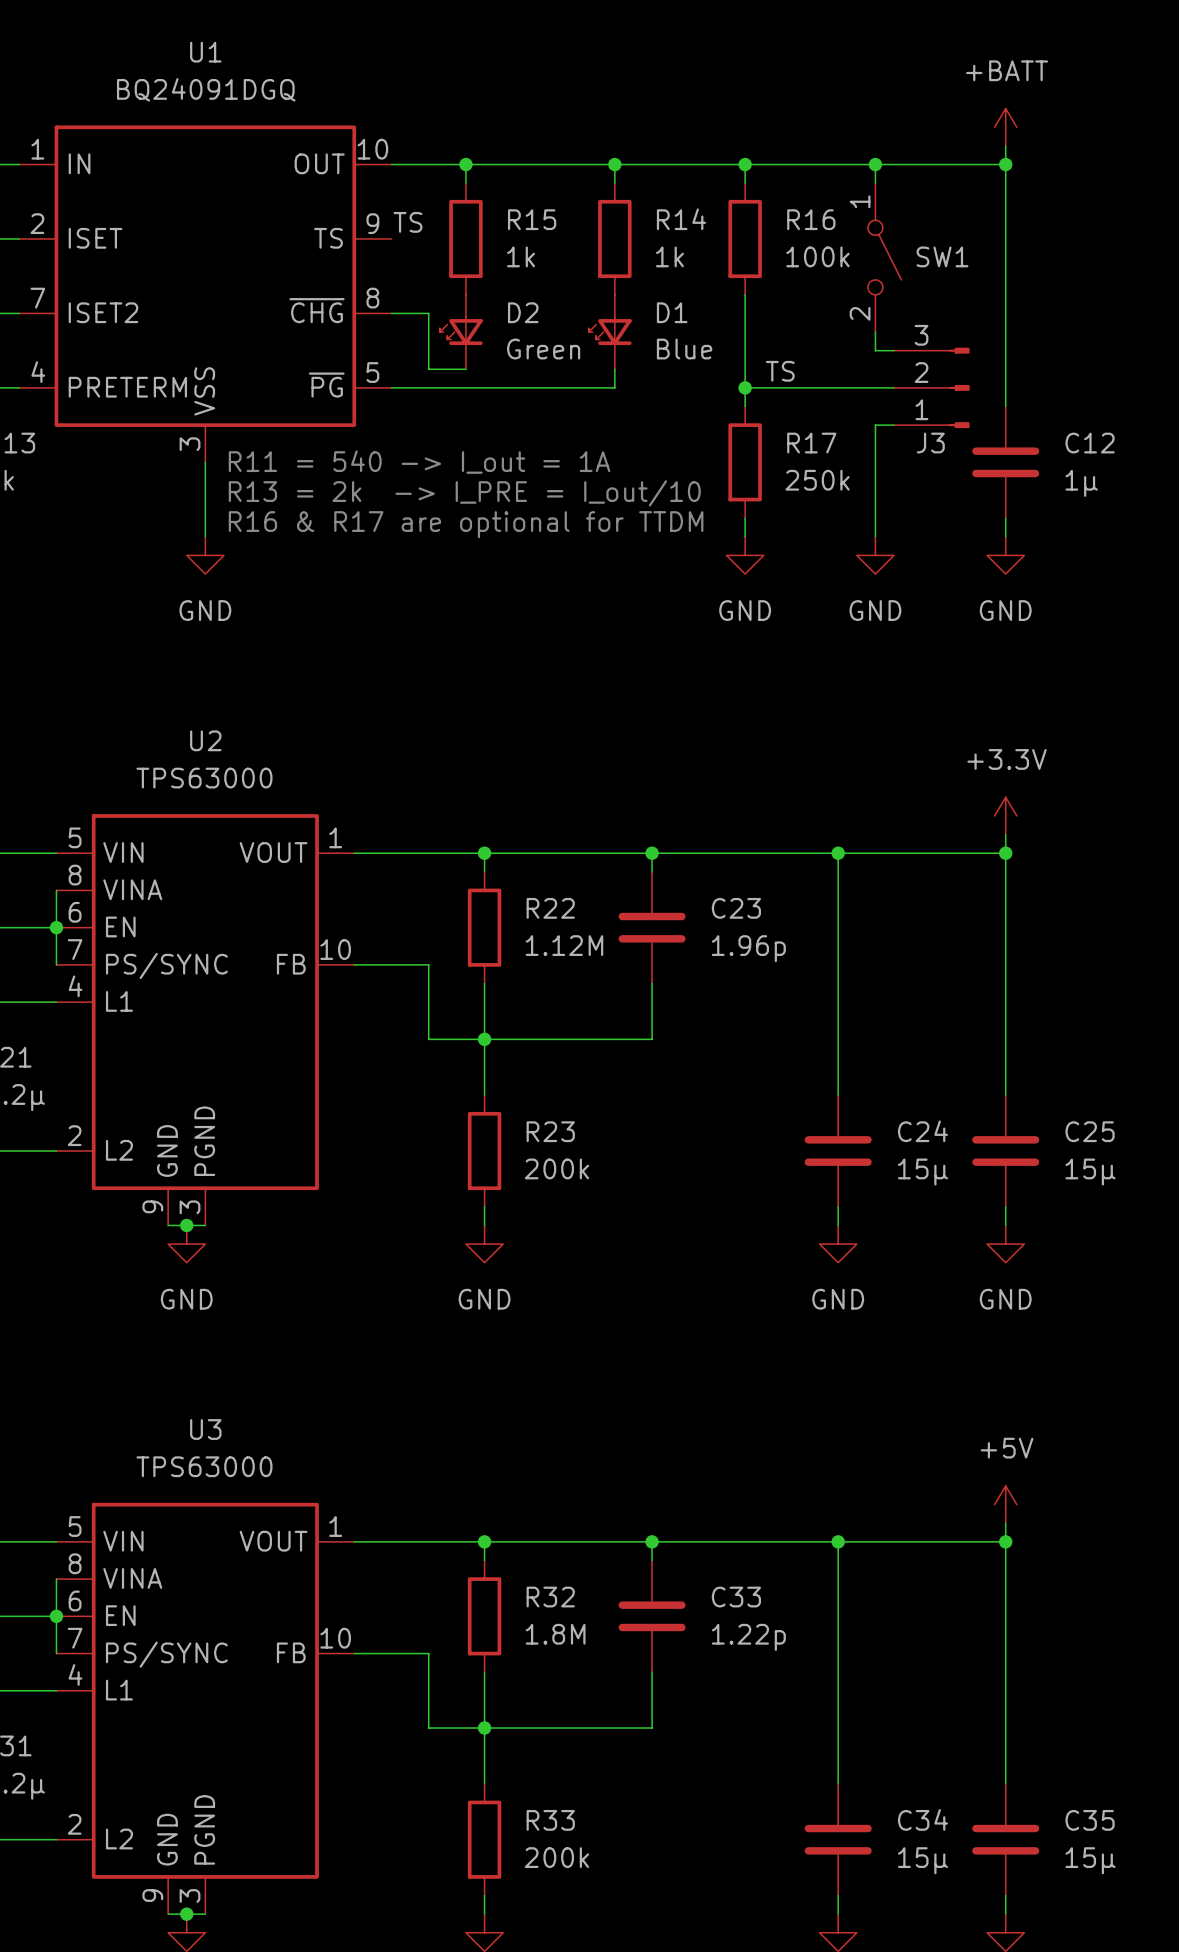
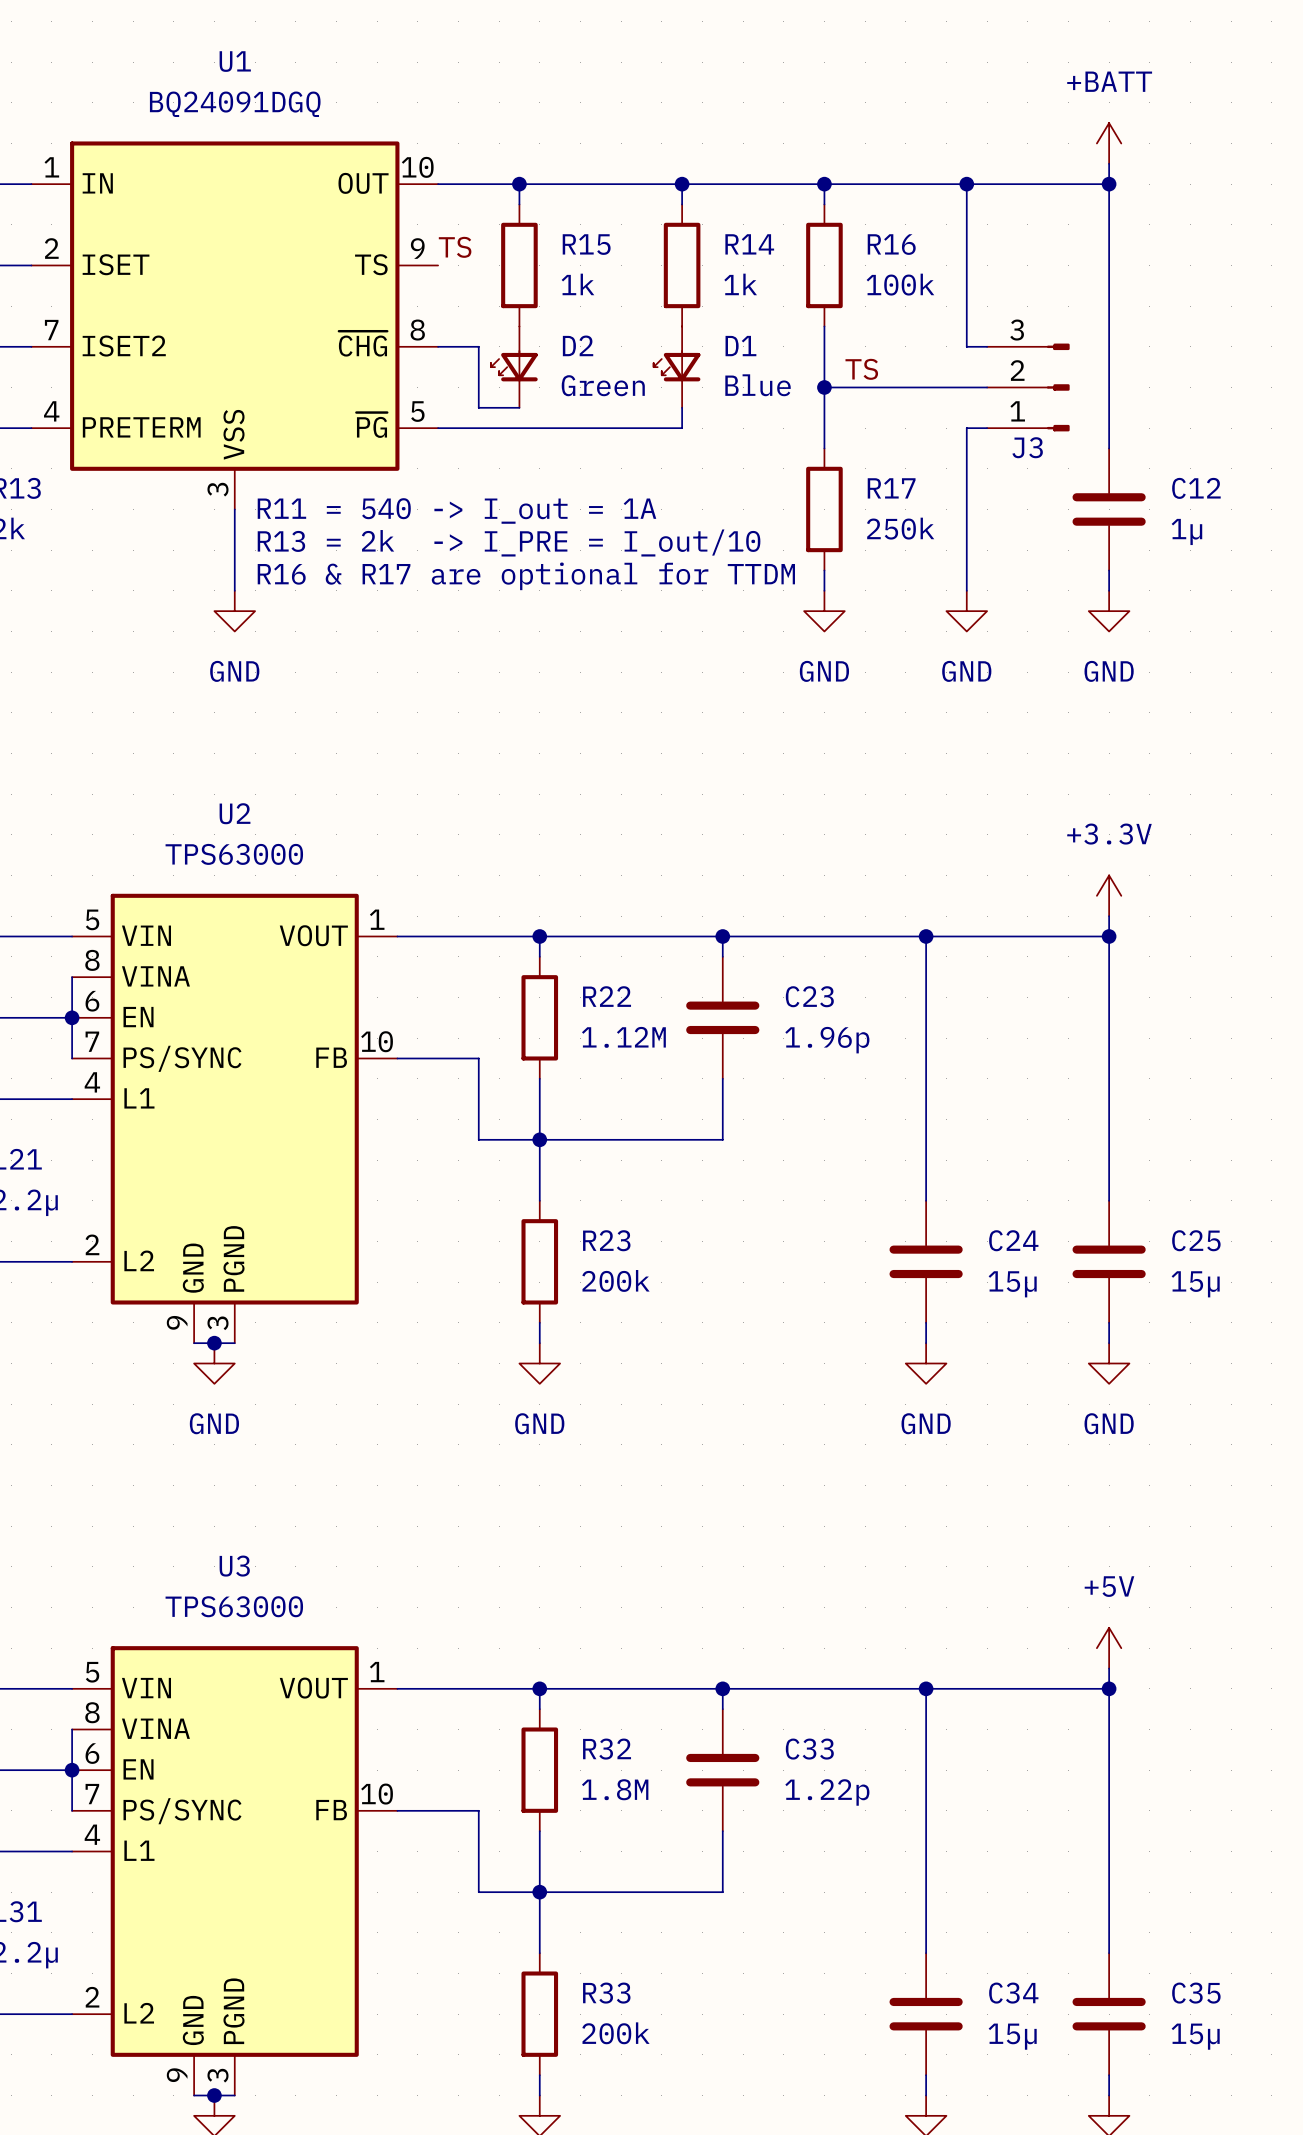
wire: none -> (966, 204) (966, 346) (987, 346)
SW1: (884, 257) -> none
wire: (875, 332) (875, 350) -> (824, 387) (966, 387)
label position: TS (780, 371) -> TS (861, 369)
wire: (745, 387) (875, 387) -> none
junction position: (745, 387) -> (824, 387)
J3 position: (931, 387) -> (1028, 387)
wire: (875, 425) (894, 425) -> (966, 468) (966, 428)

